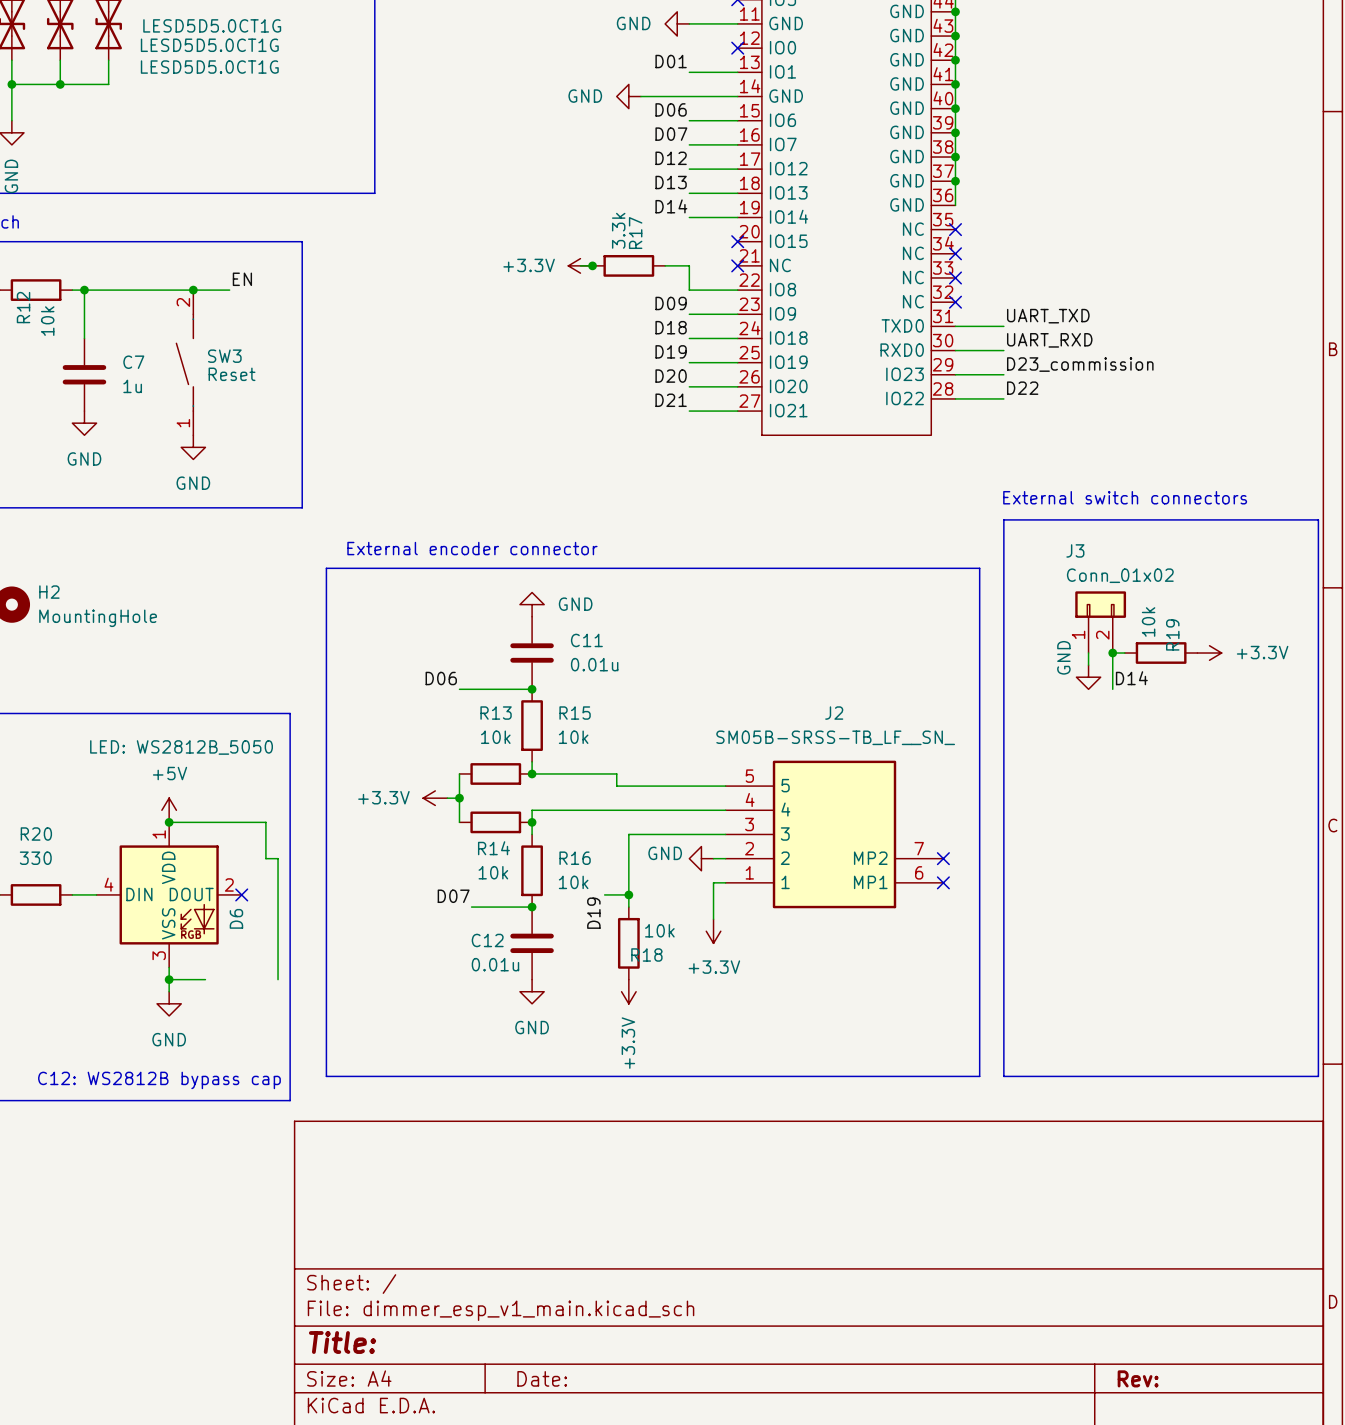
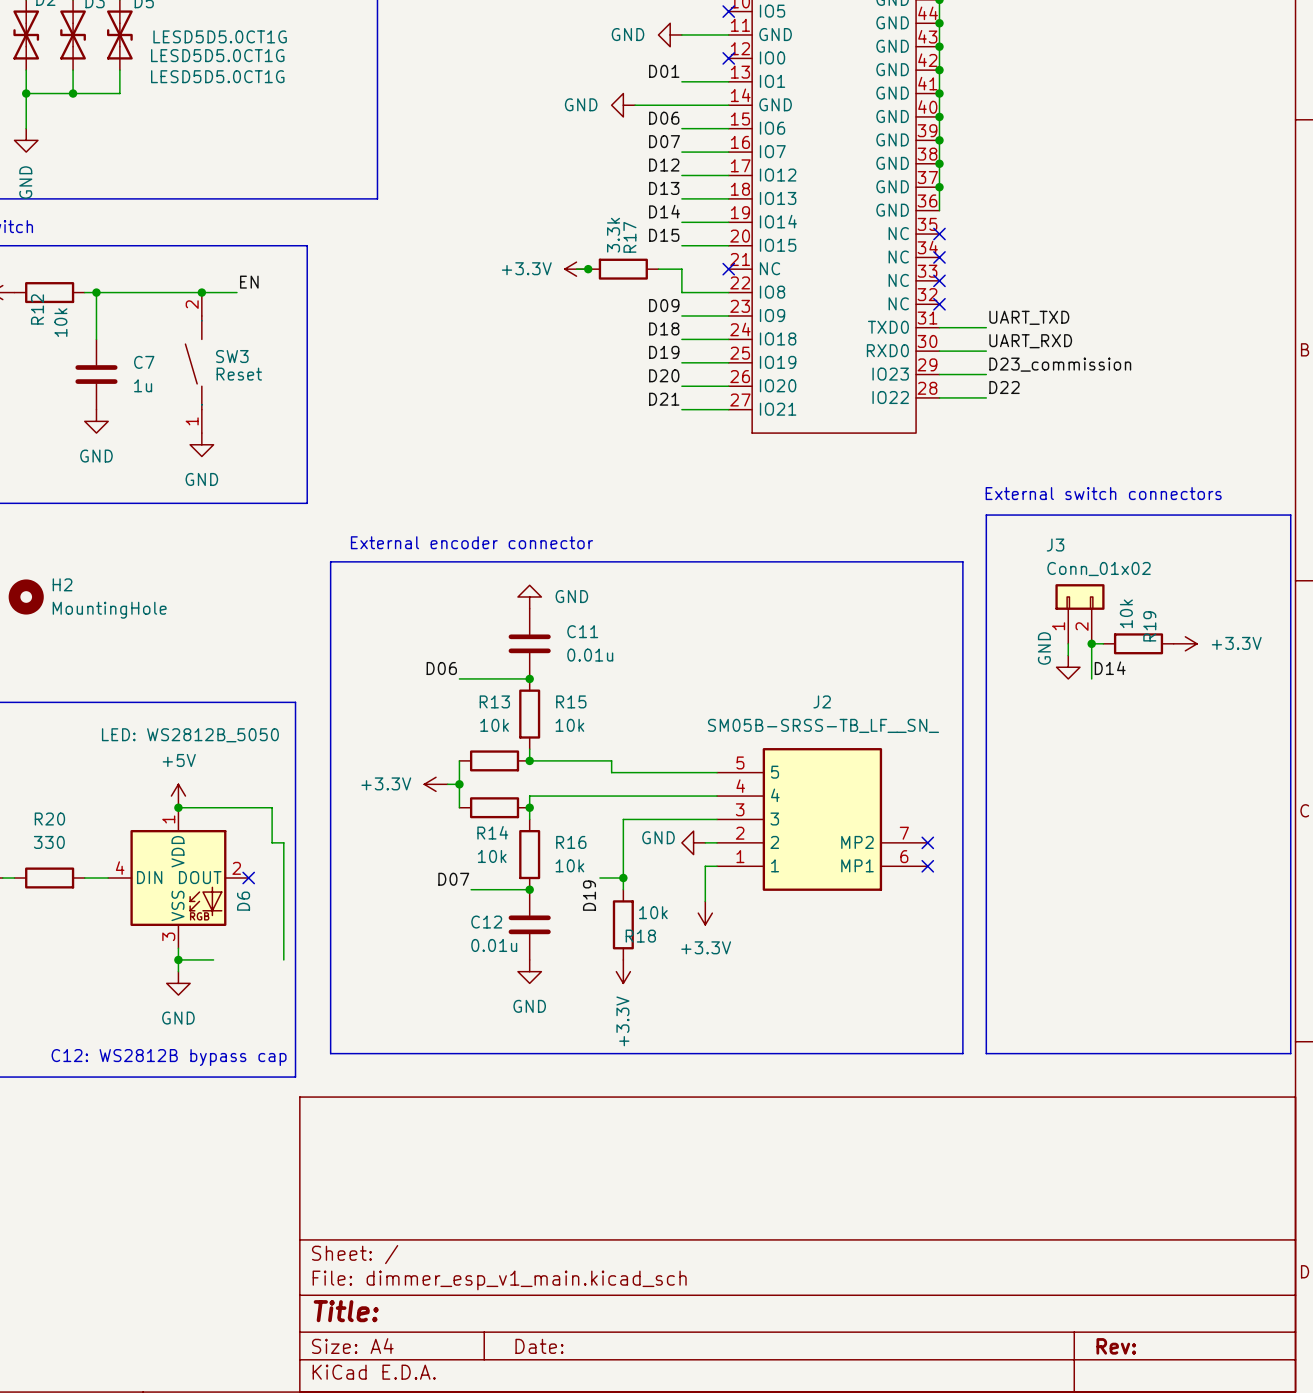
label: none -> D15 (664, 235)
wire: none -> (681, 245) (728, 245)
no-connect mark: (737, 241) -> none

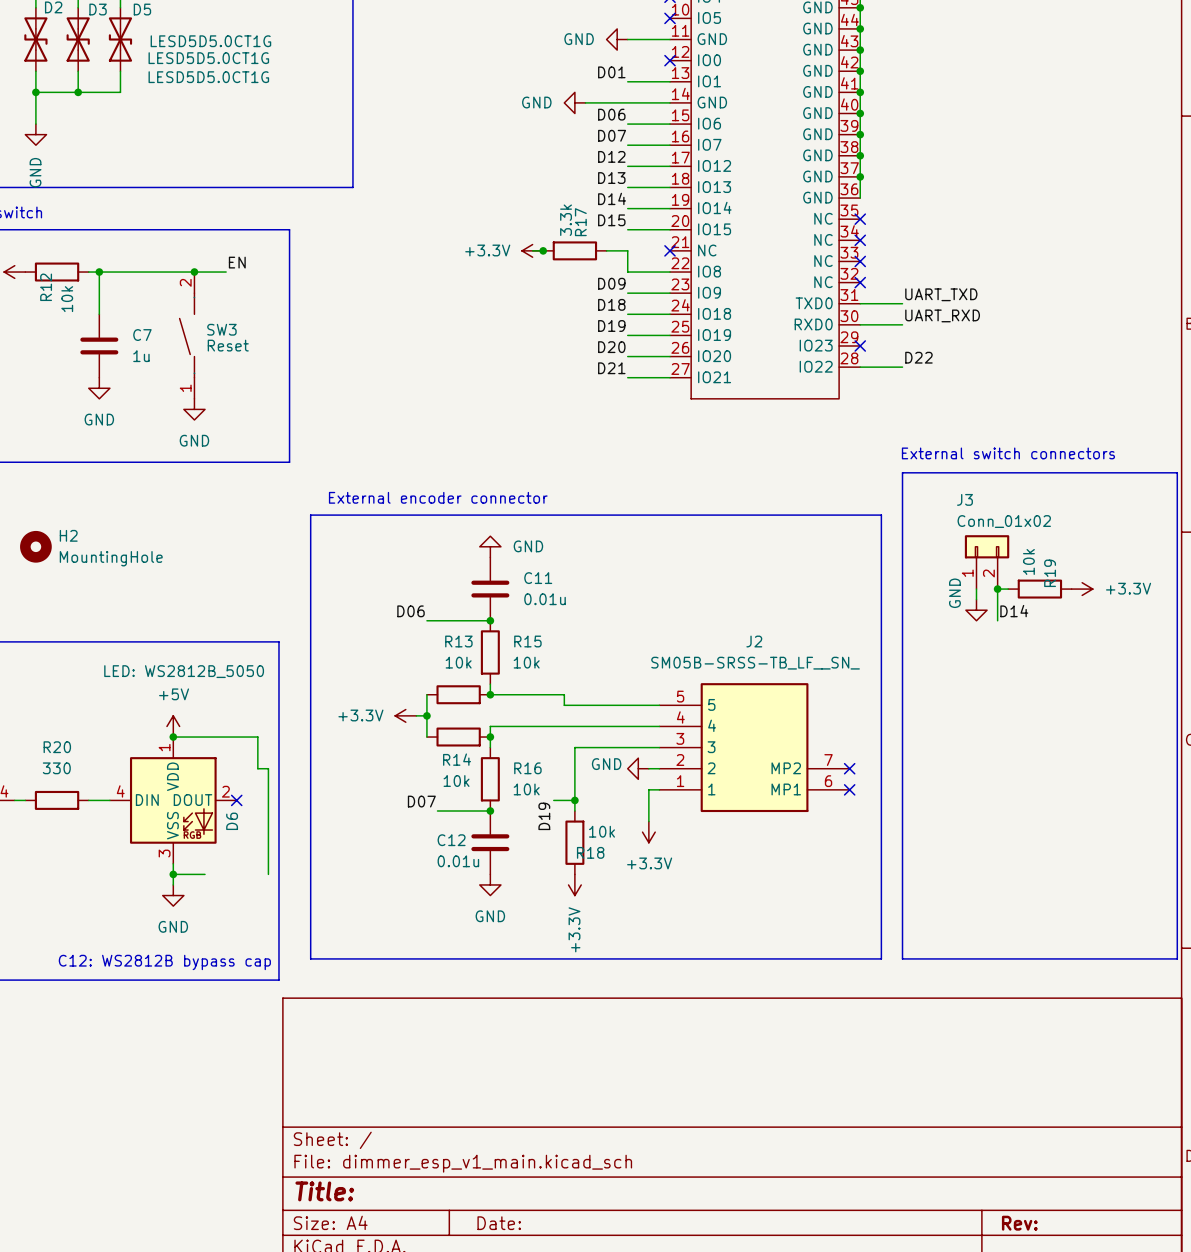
label: D23_commission (1060, 364) -> none
wire: (939, 374) (986, 374) -> none
no-connect mark: none -> (860, 345)

